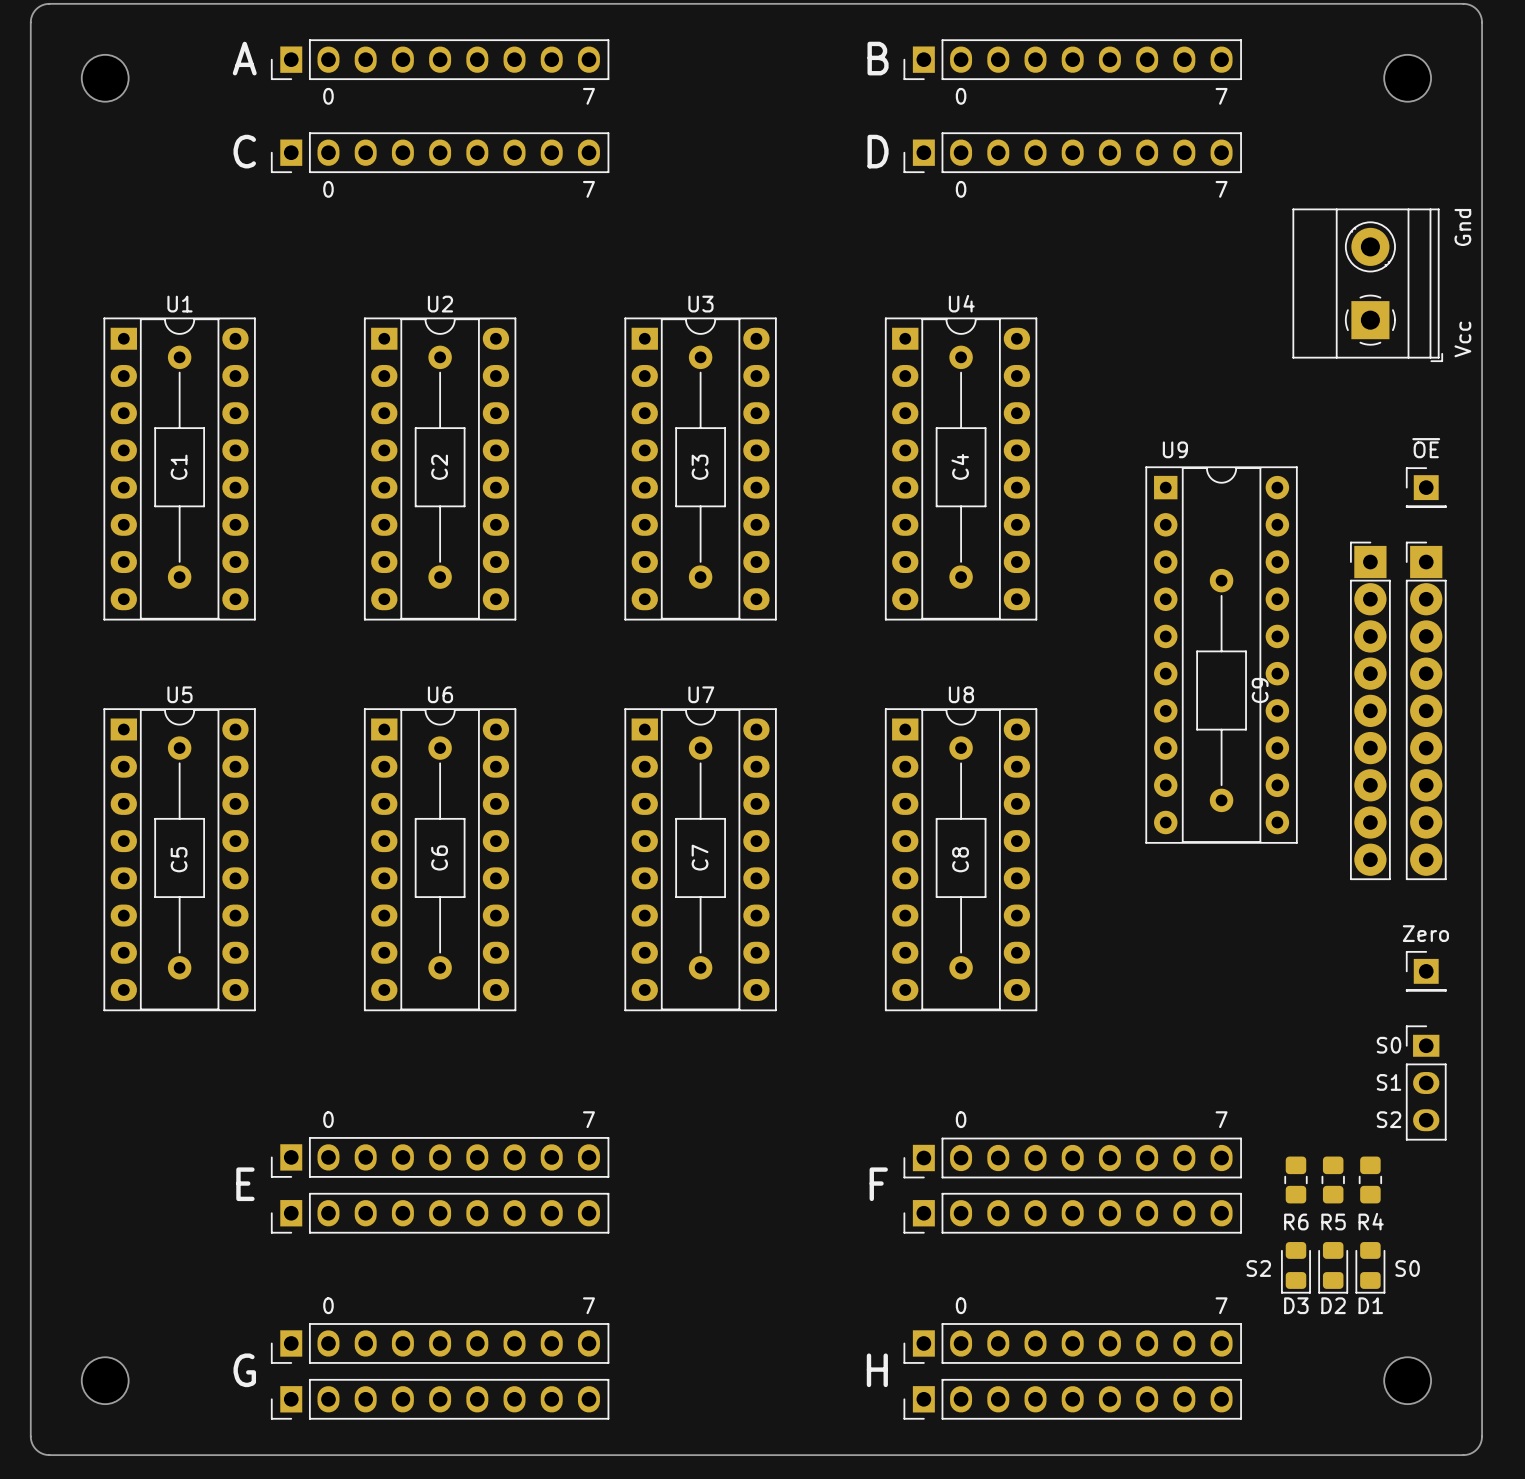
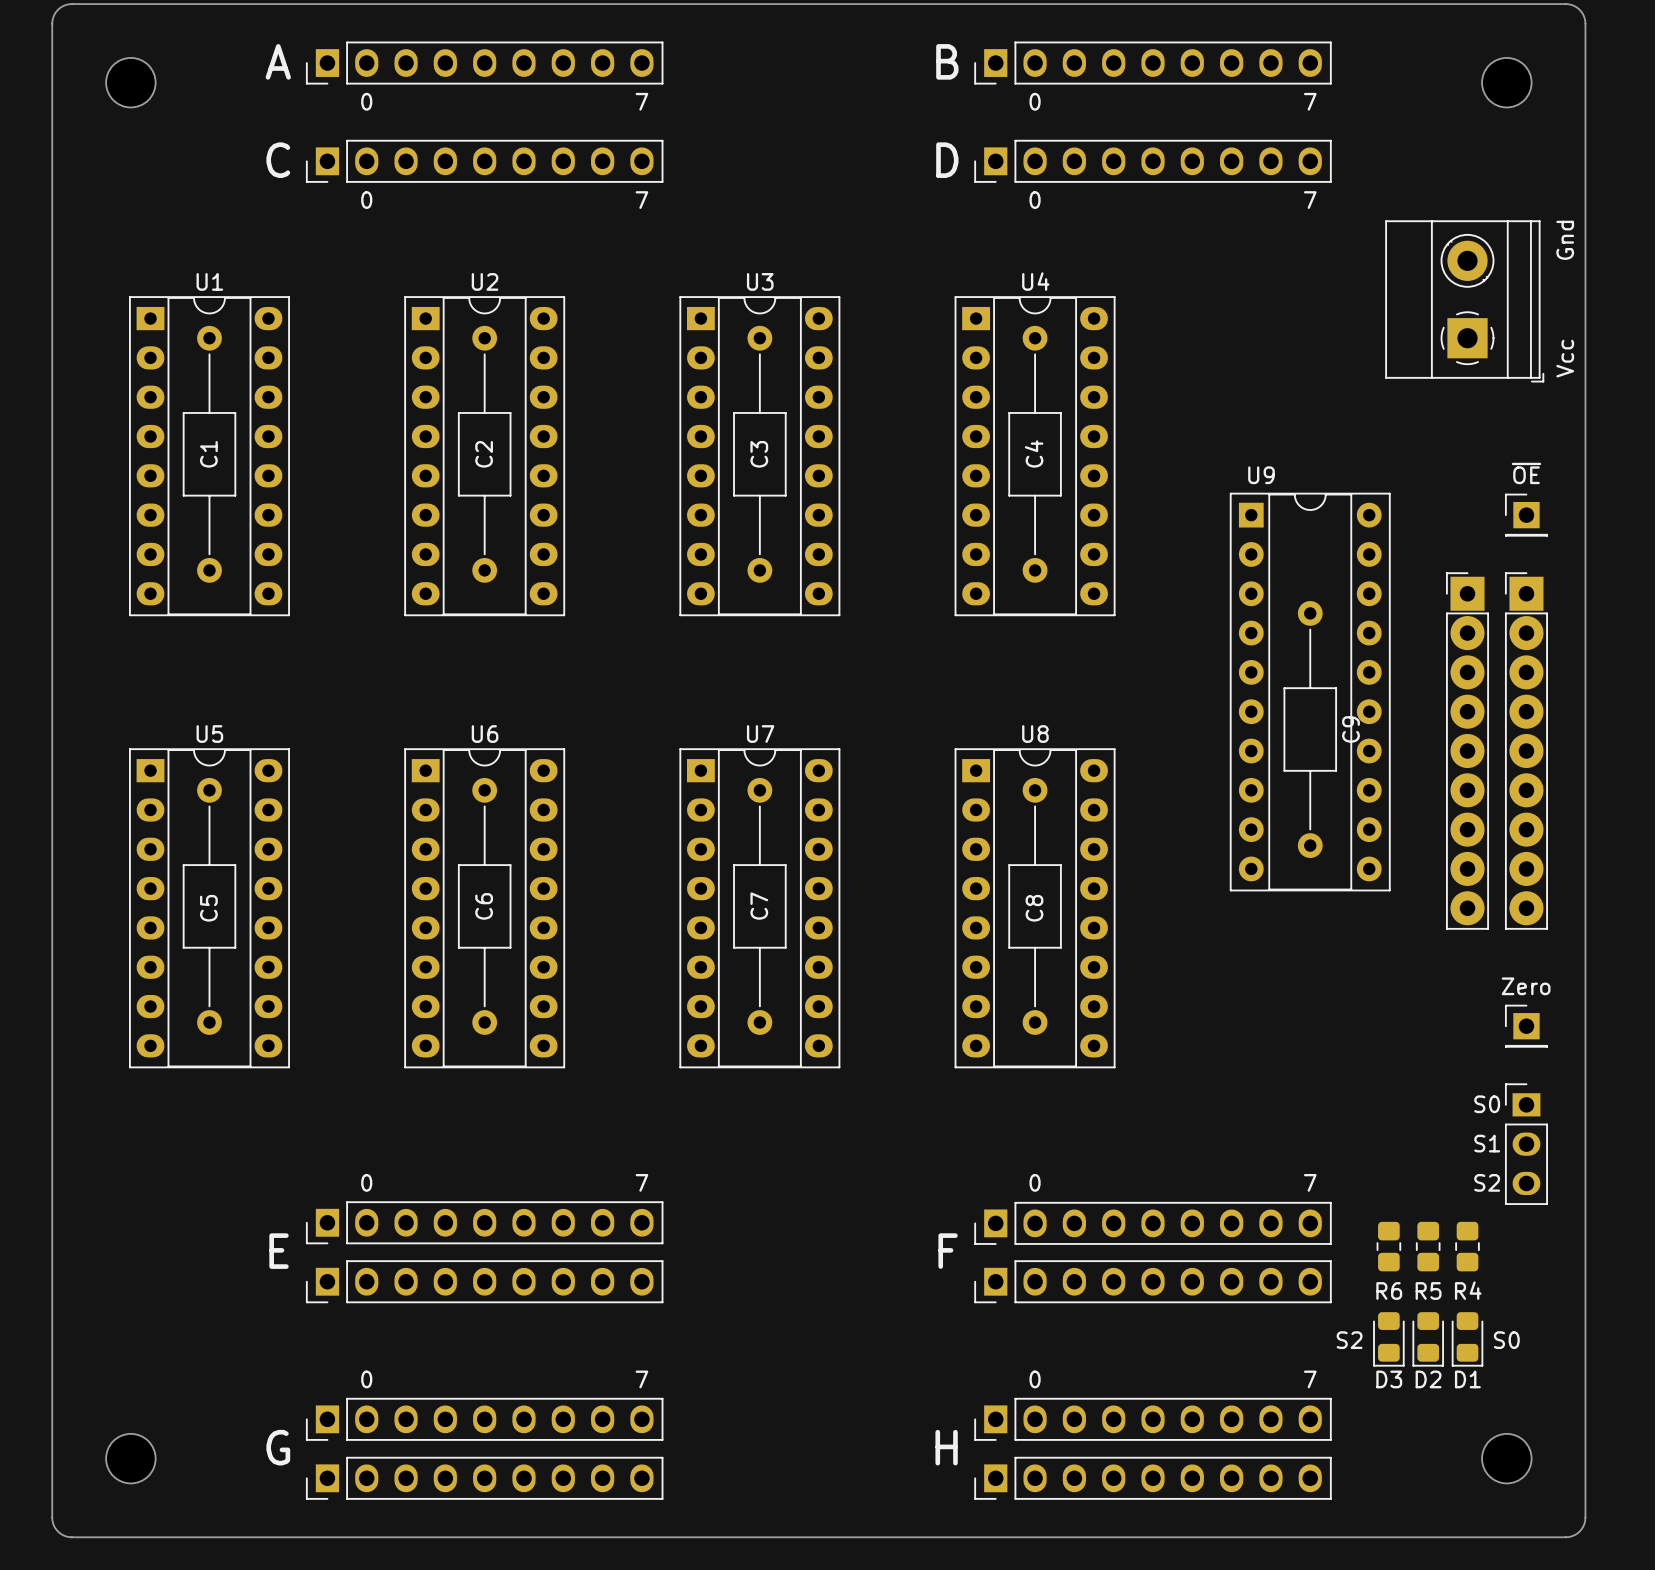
C1 position: (179, 467) -> (209, 454)
C2 position: (440, 467) -> (484, 454)
C3 position: (700, 467) -> (759, 454)
C4 position: (961, 467) -> (1035, 454)
U1 position: (179, 468) -> (209, 456)
U2 position: (440, 468) -> (484, 456)
U3 position: (700, 468) -> (759, 456)
U4 position: (961, 468) -> (1035, 456)

